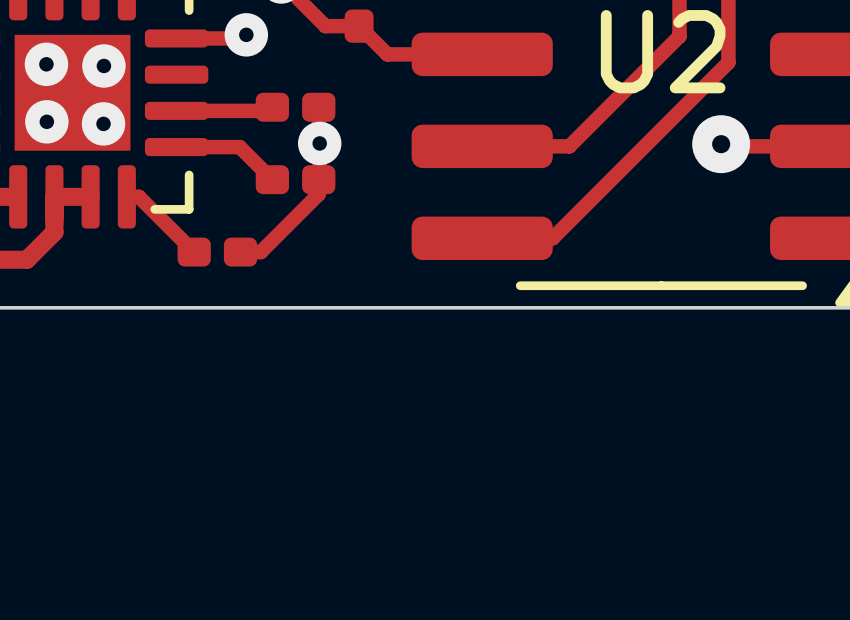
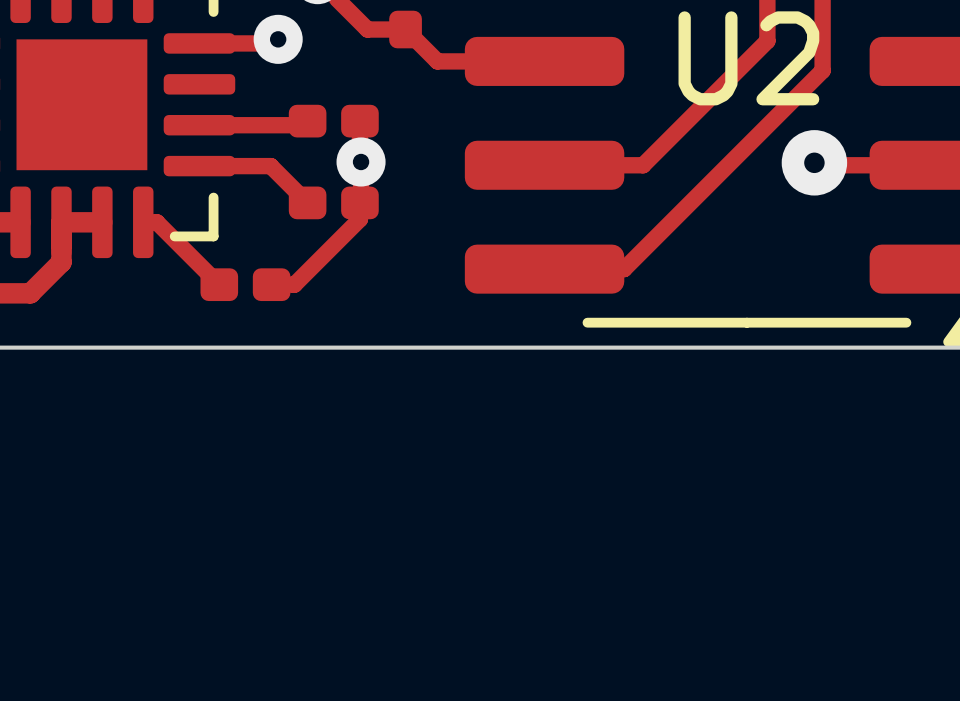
via: (46, 64) -> none
via: (103, 65) -> none
via: (46, 121) -> none
via: (103, 123) -> none

